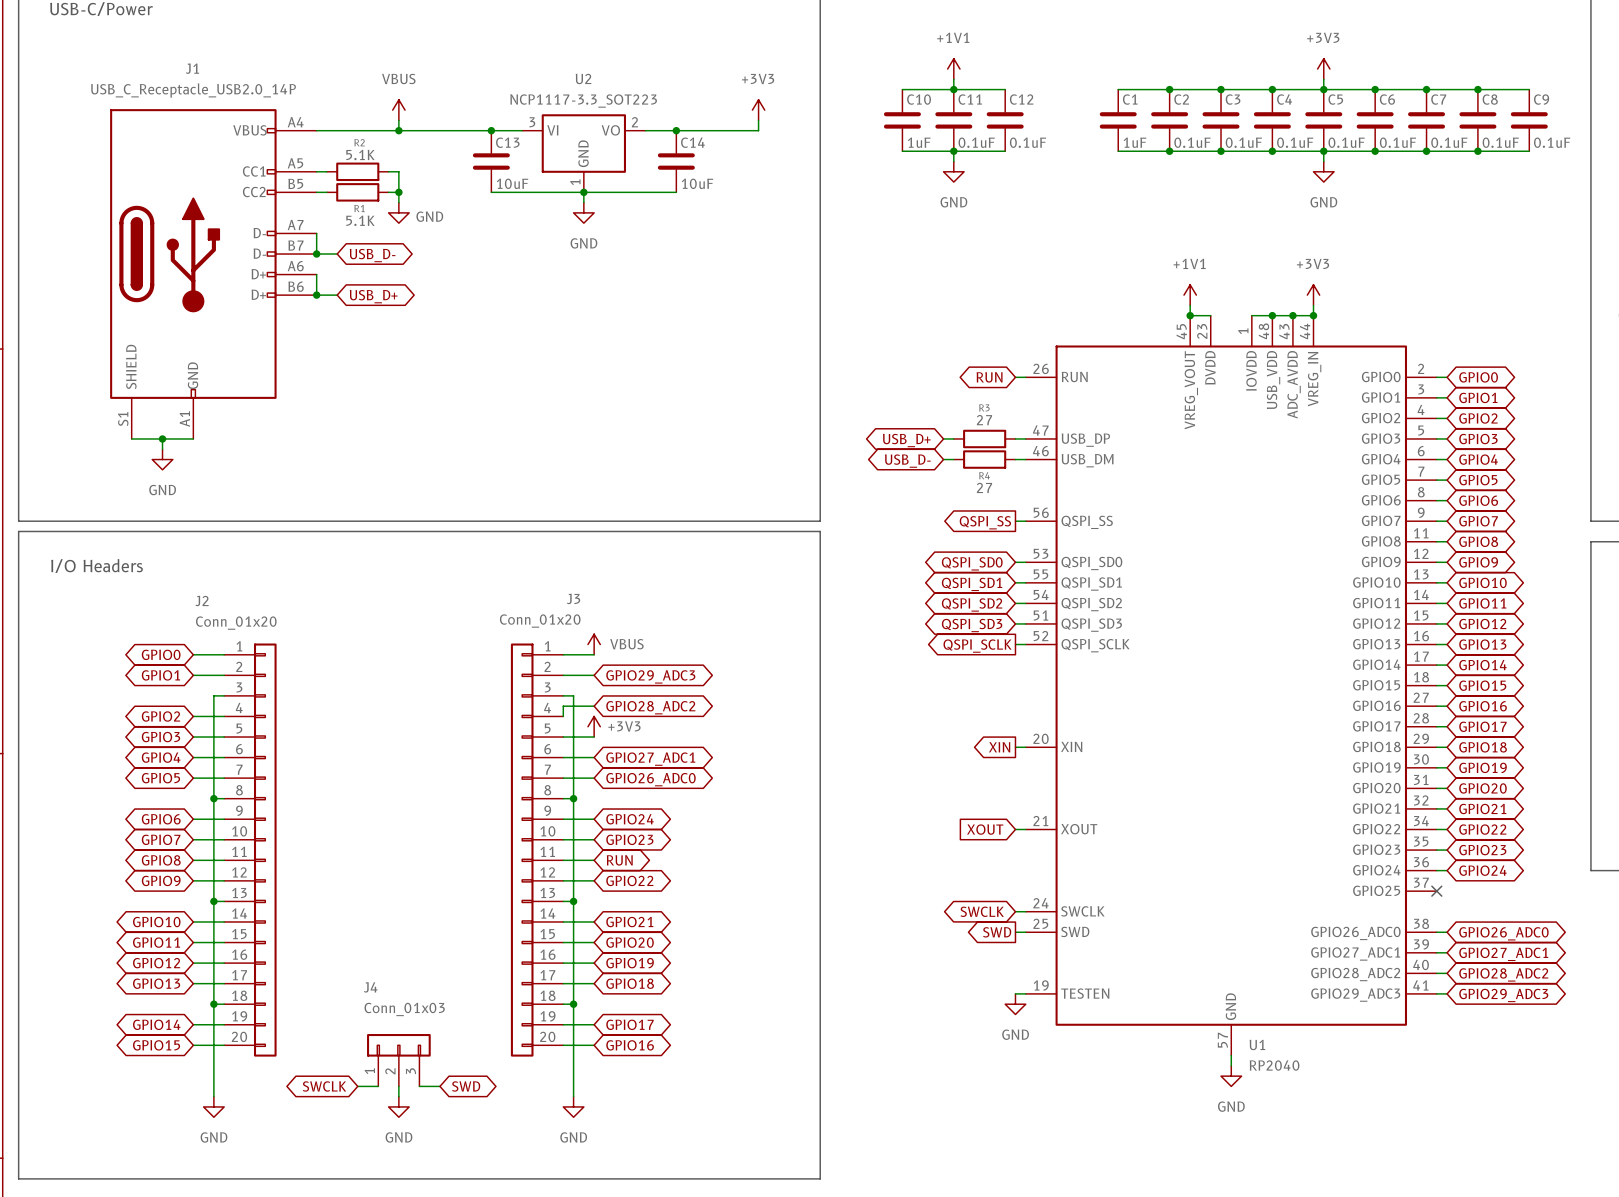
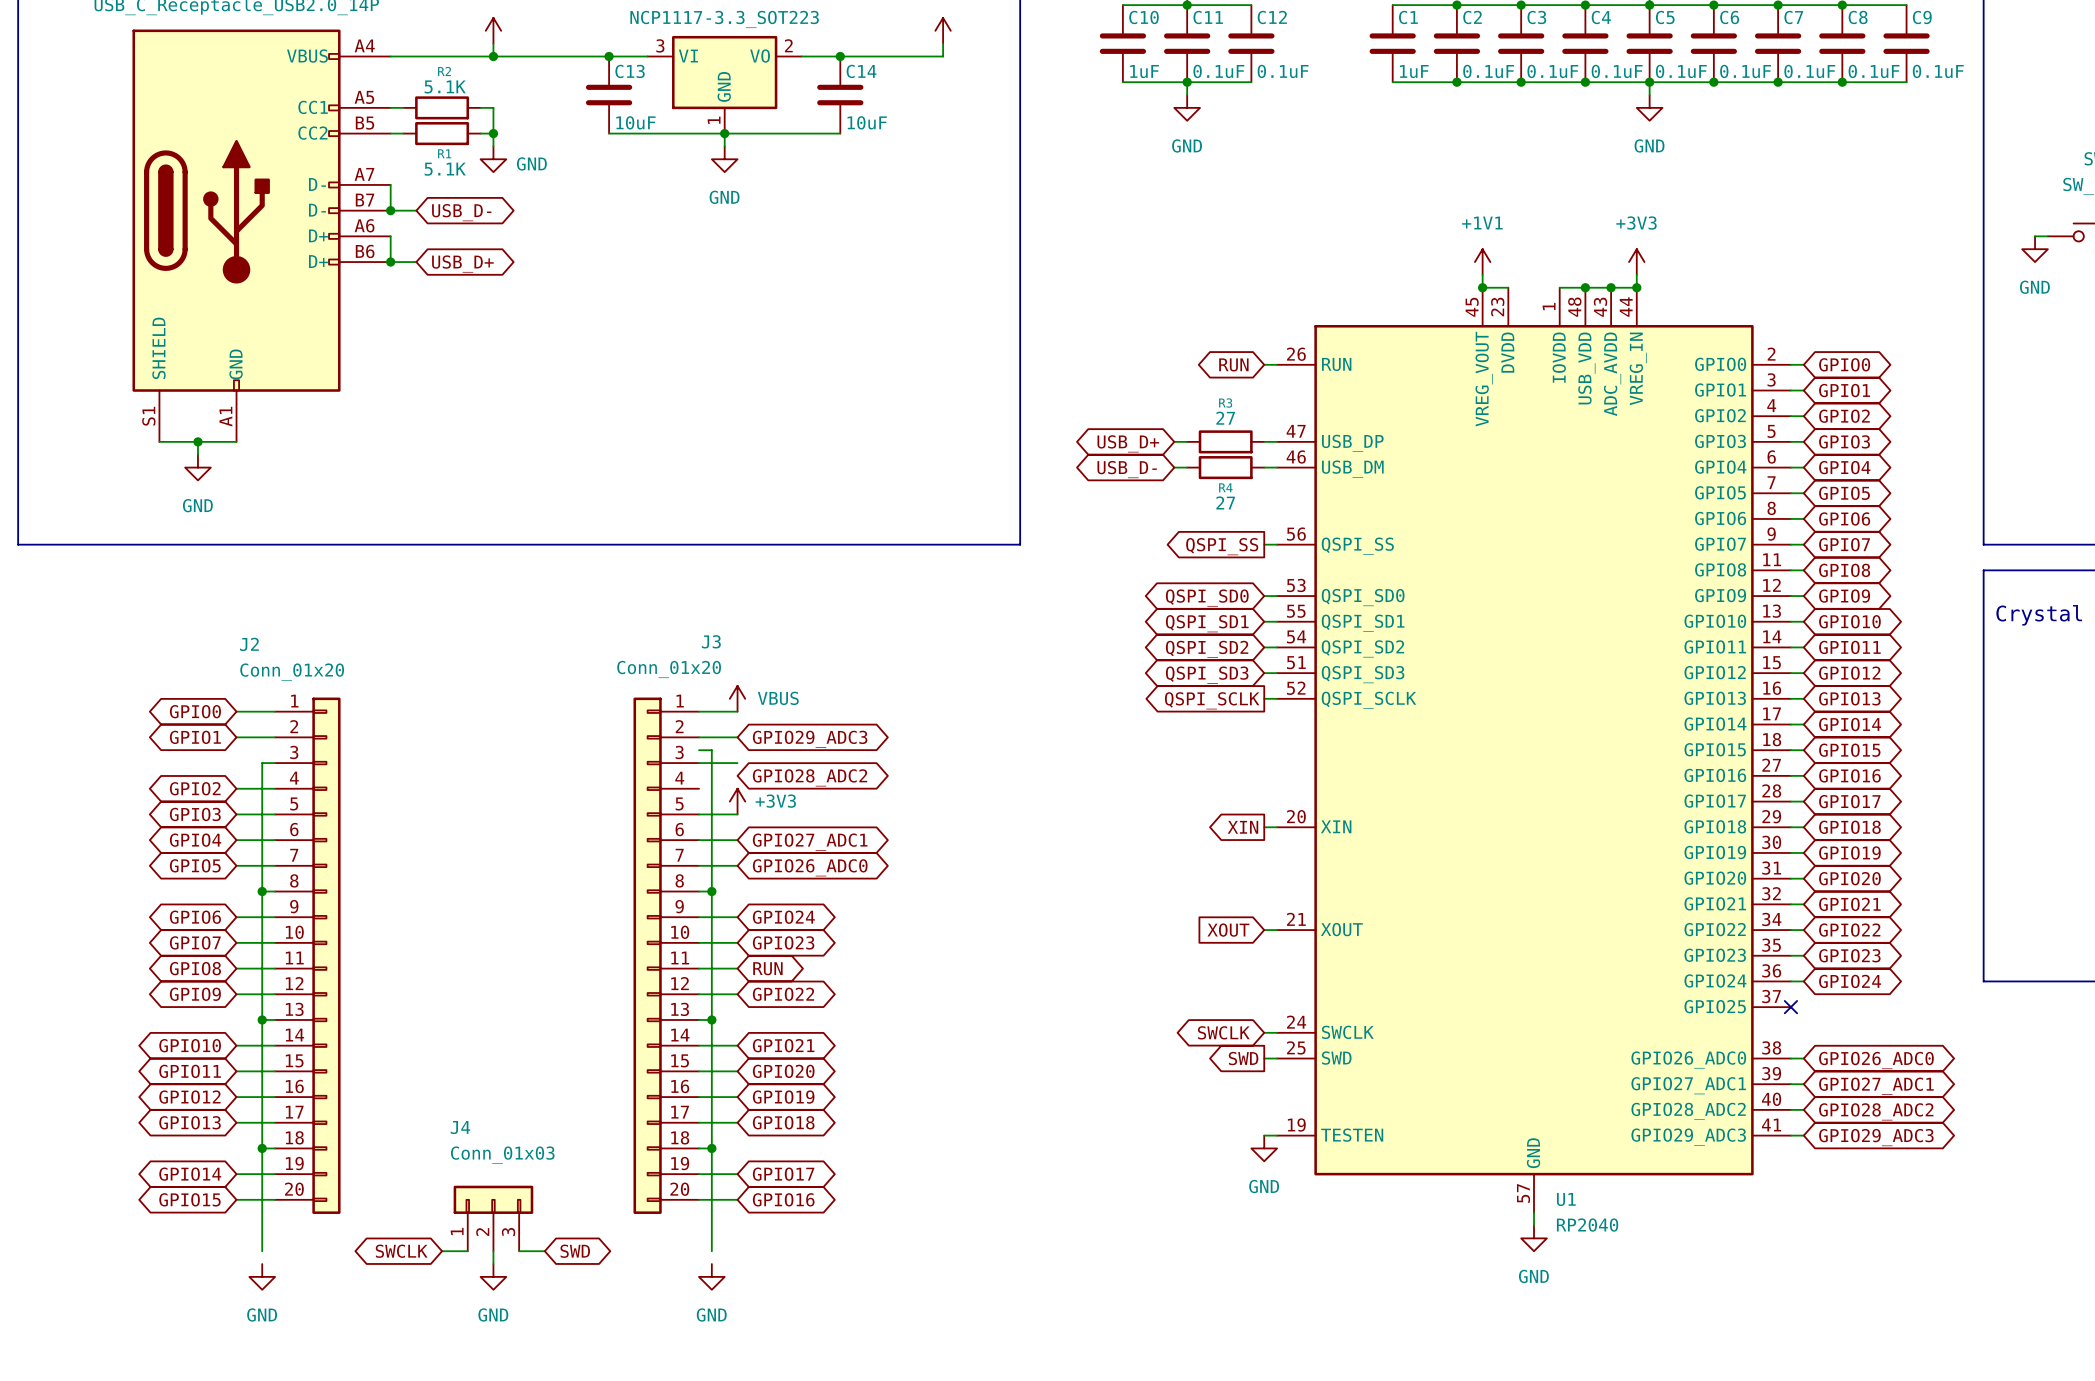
line: (18, 531) (820, 531) (820, 1178) (18, 1178) (18, 531) -> none
text: I/O Headers (97, 565) -> none
wire: none -> (698, 750) (711, 750) (711, 763) (737, 763)
wire: (594, 706) (563, 706) (563, 716) -> none
wire: (213, 1086) (213, 1096) -> none
wire: (573, 1086) (573, 1096) -> none

